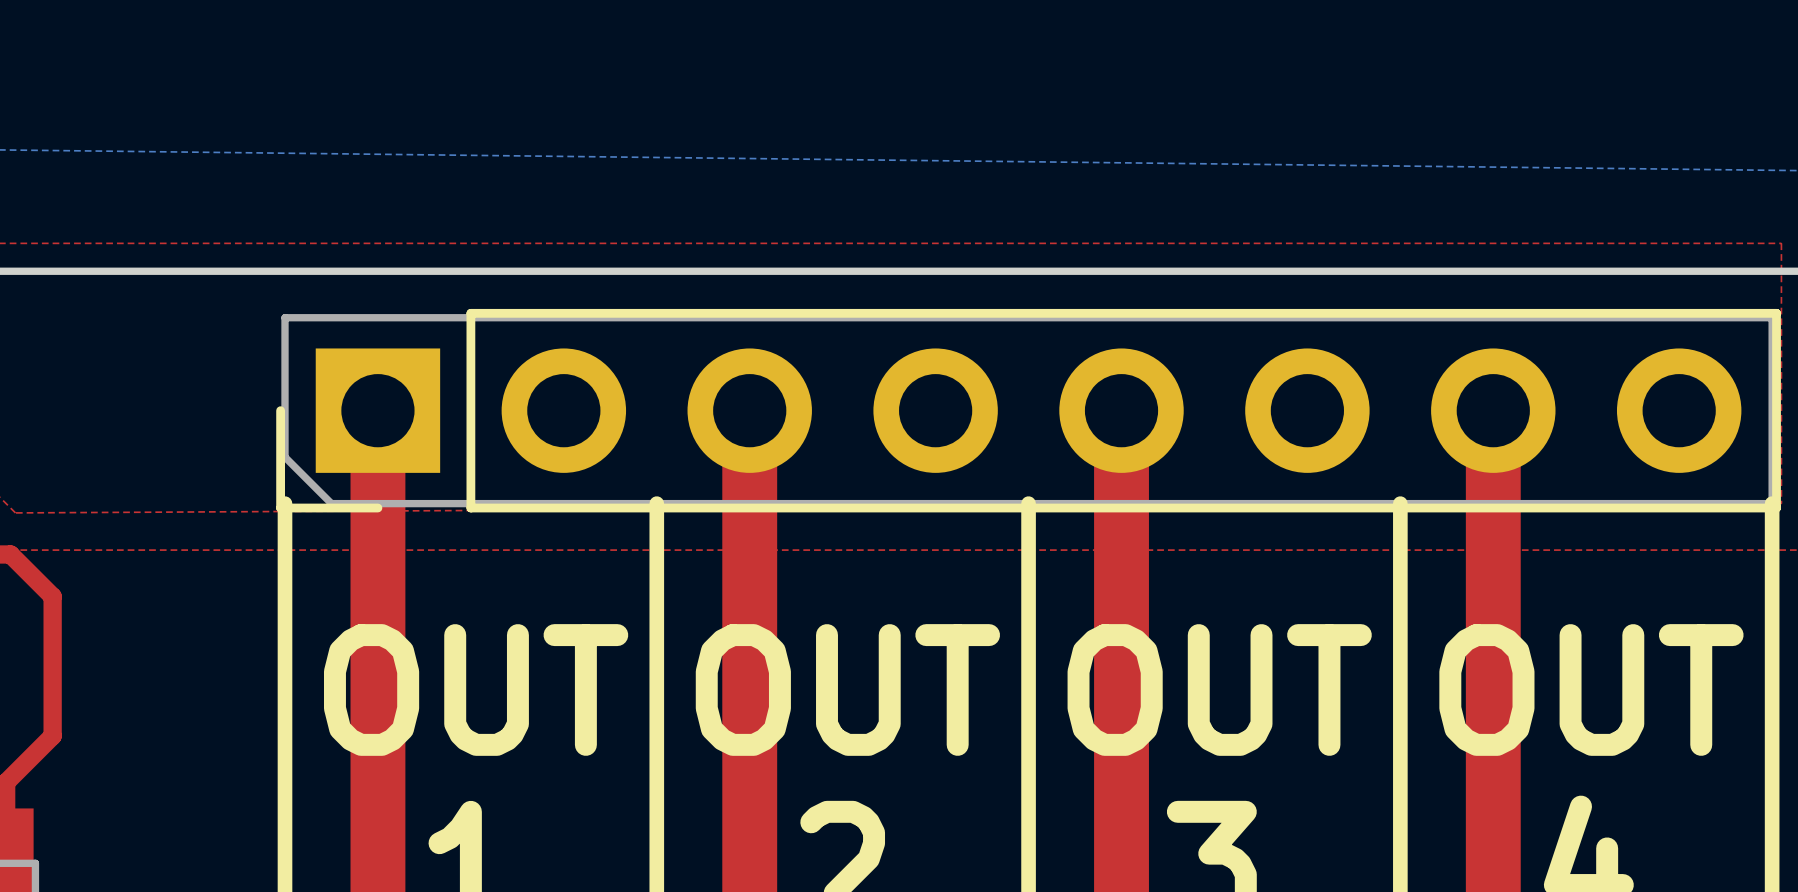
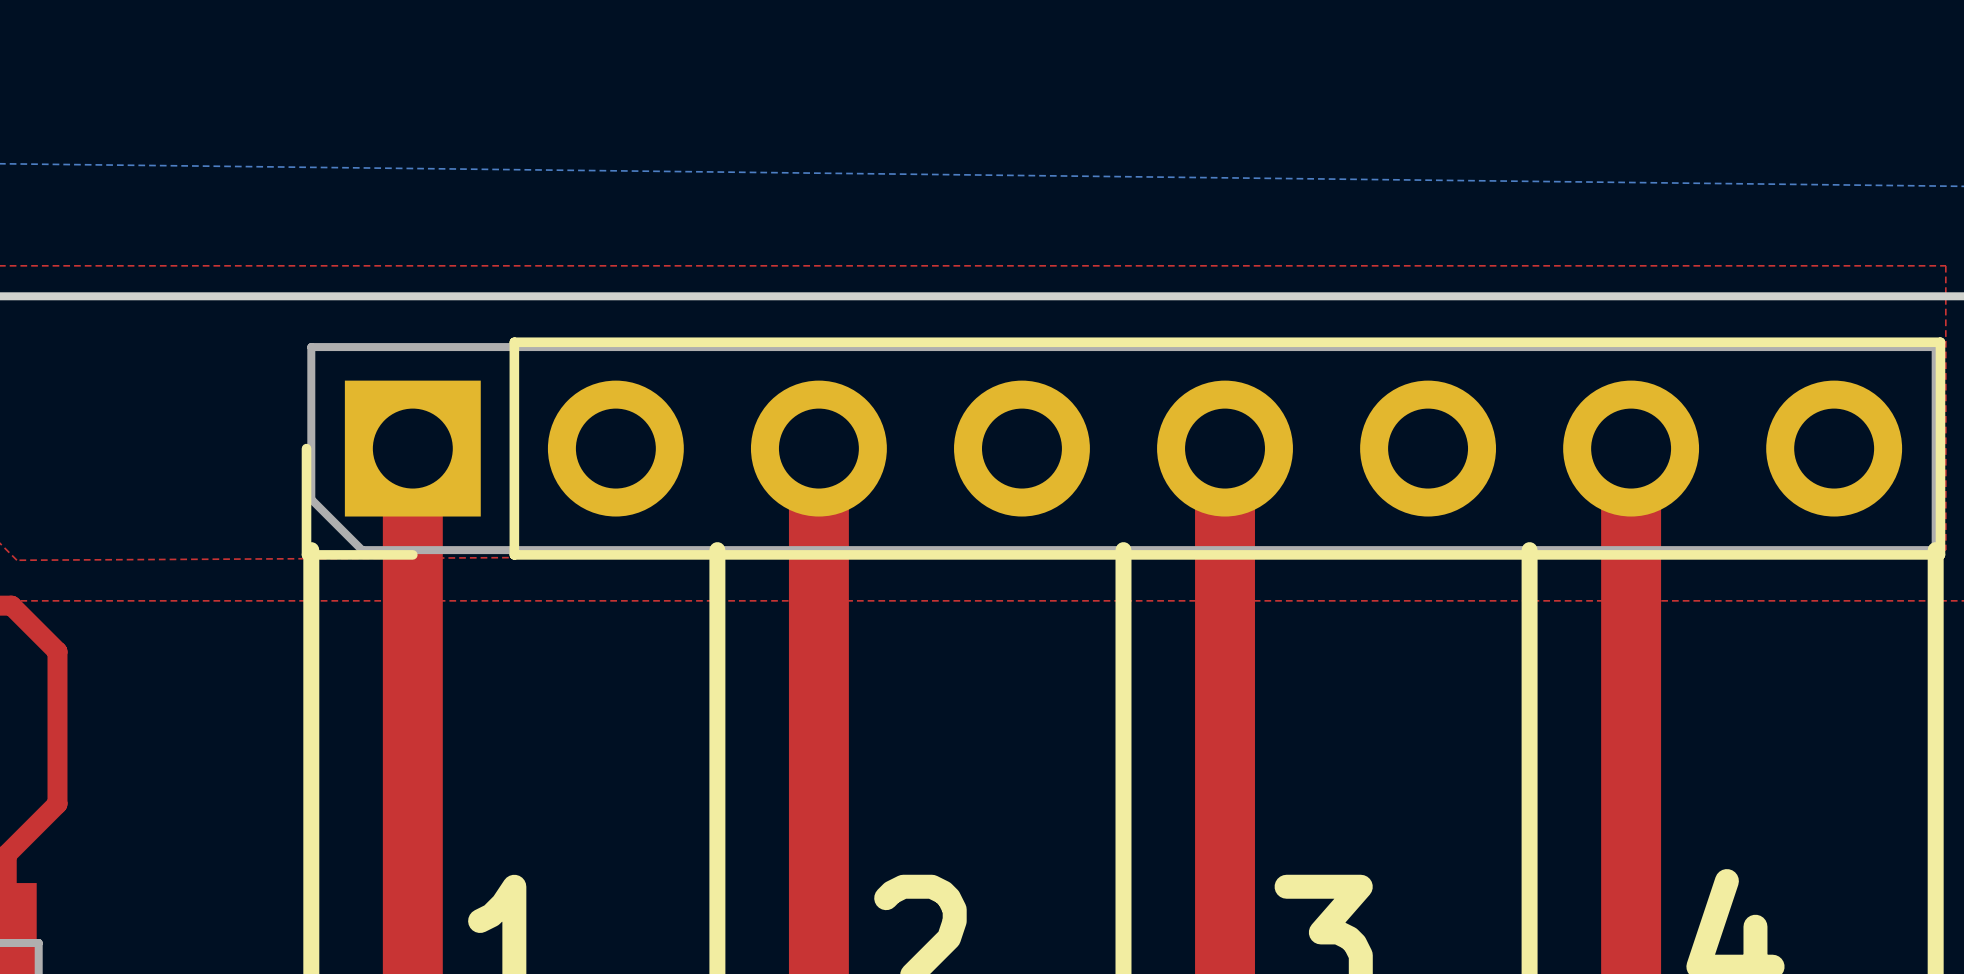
text: OUT (476, 689) -> none
text: OUT (847, 689) -> none
text: OUT (1219, 689) -> none
text: OUT (1591, 689) -> none

